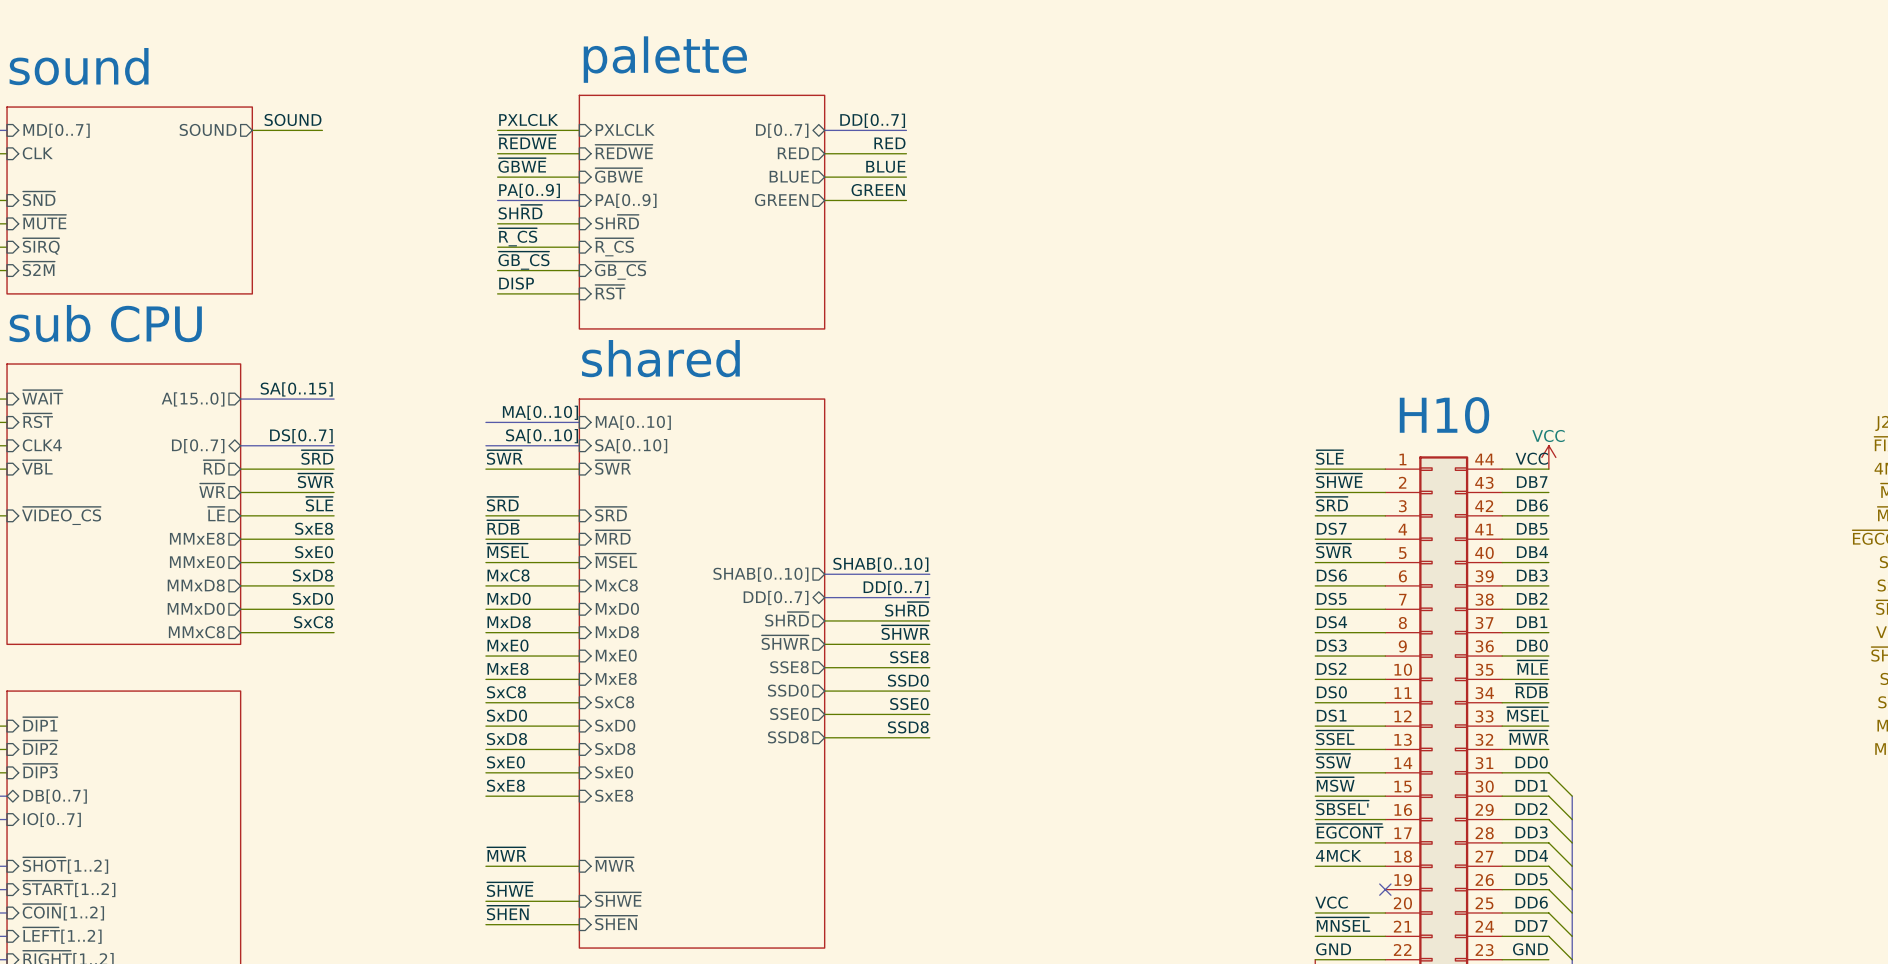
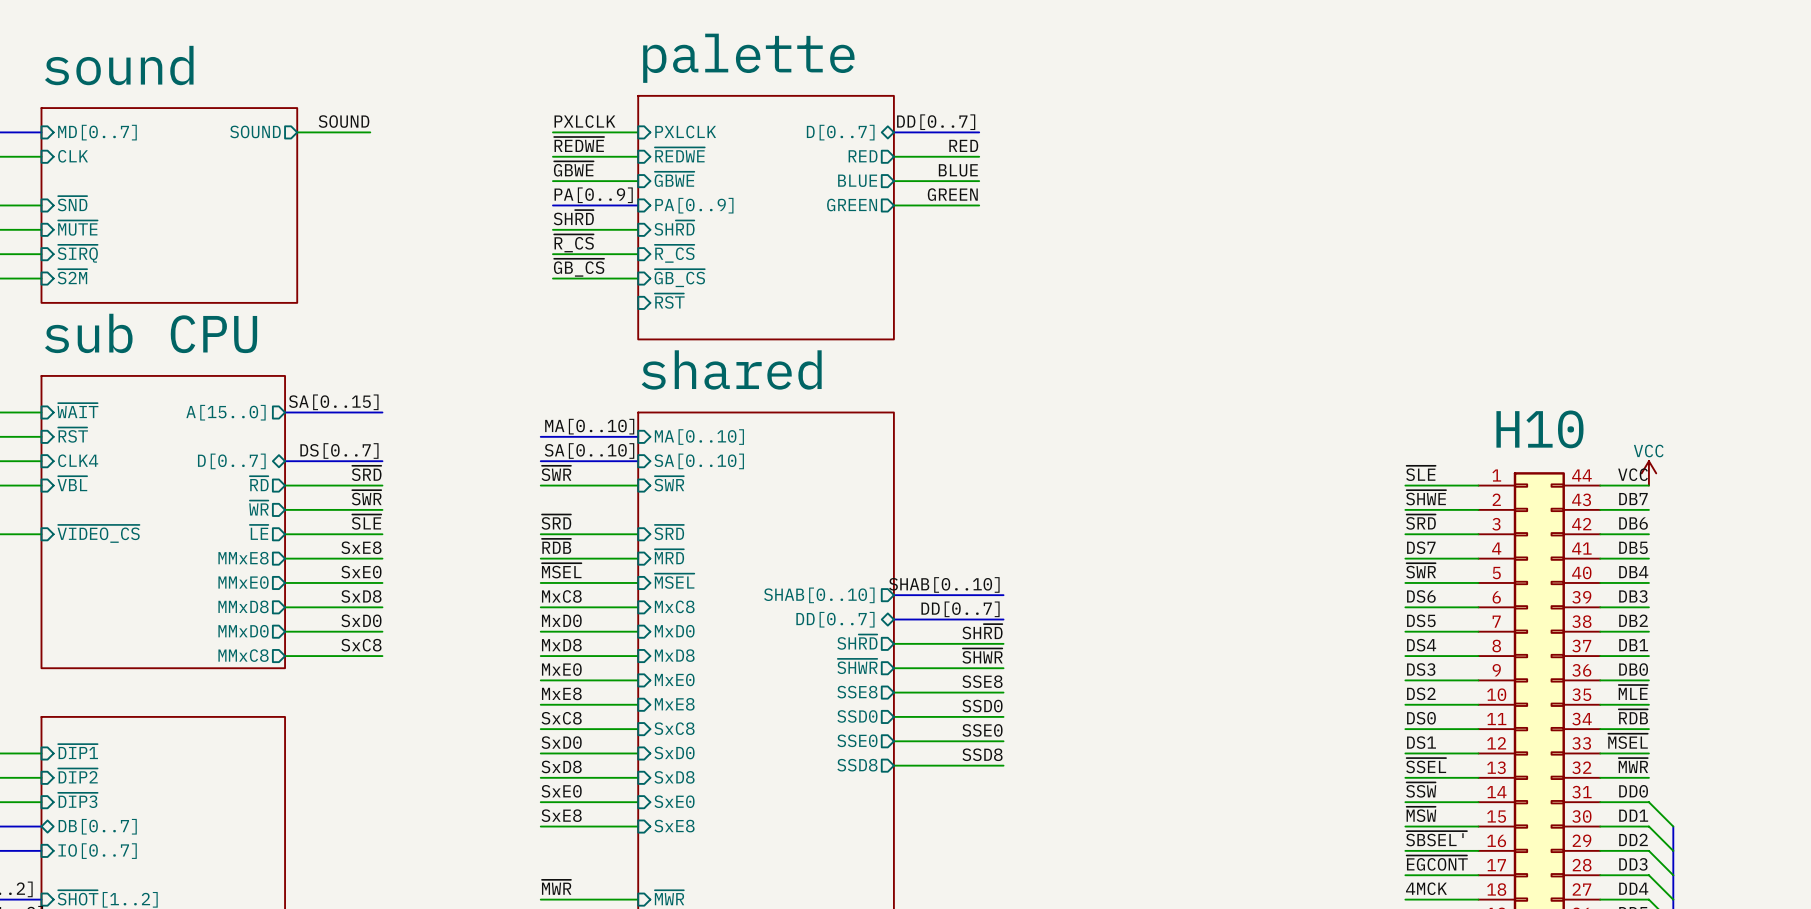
label: DISP (516, 283) -> none
wire: (497, 293) (579, 293) -> none

